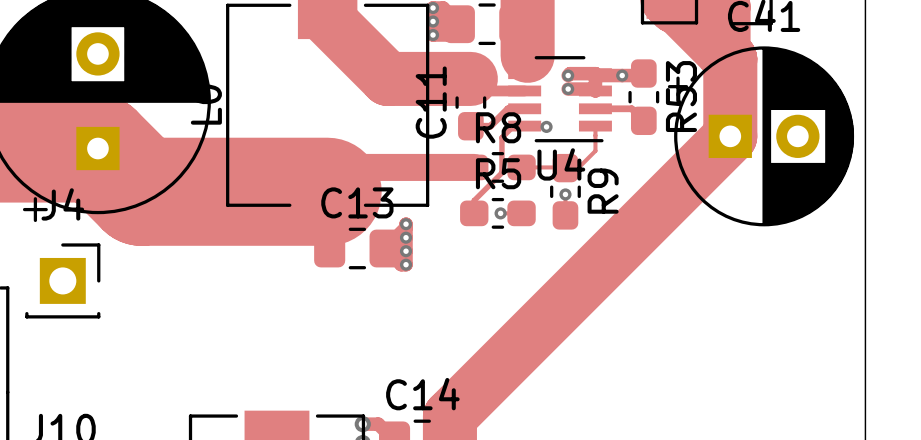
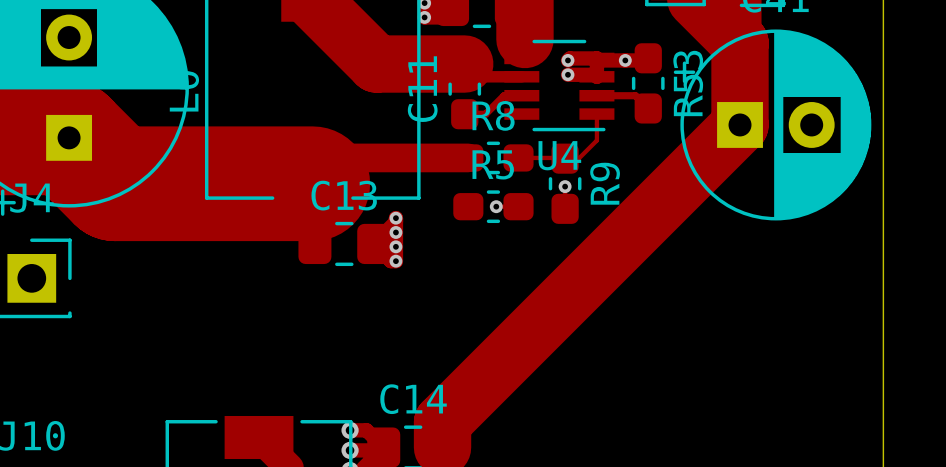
track: (546, 126) (513, 126) (501, 137) (501, 172) (474, 200) (474, 213) -> none
via: (546, 126) -> none

